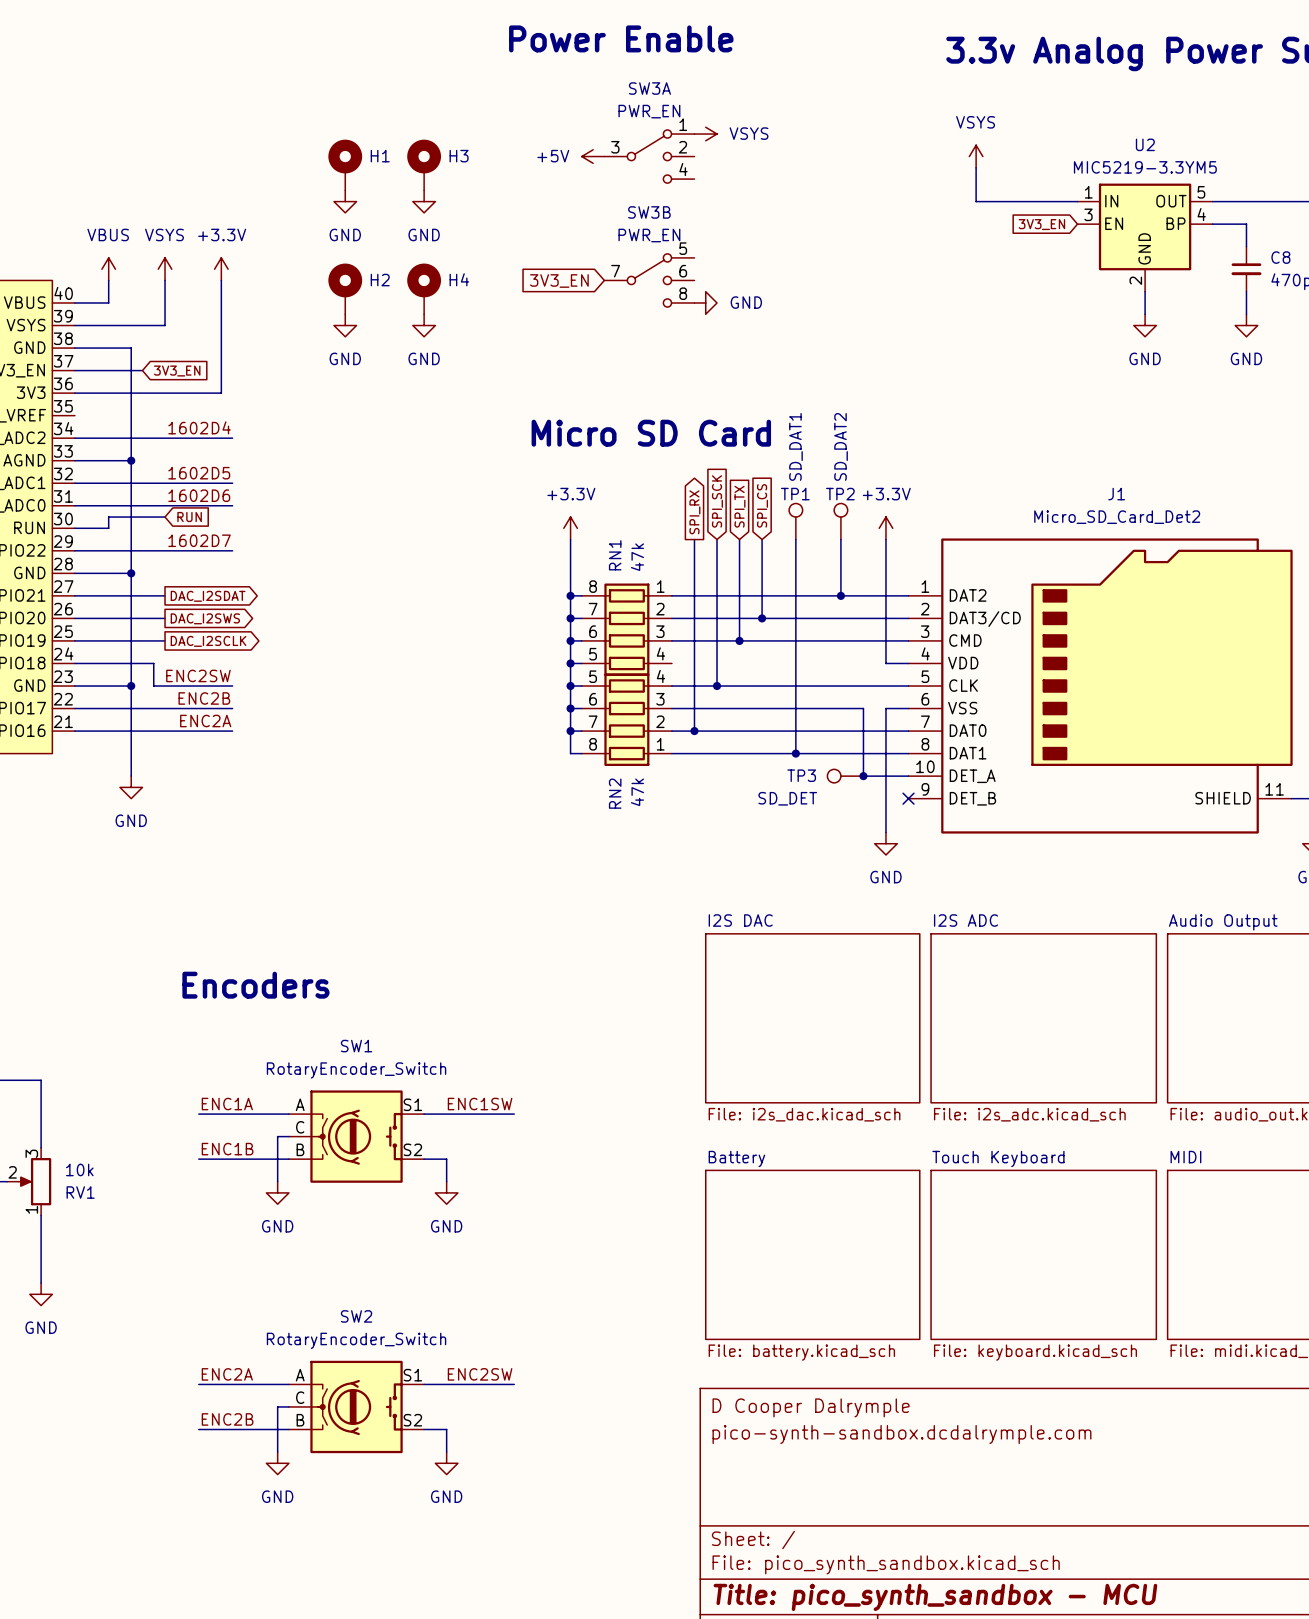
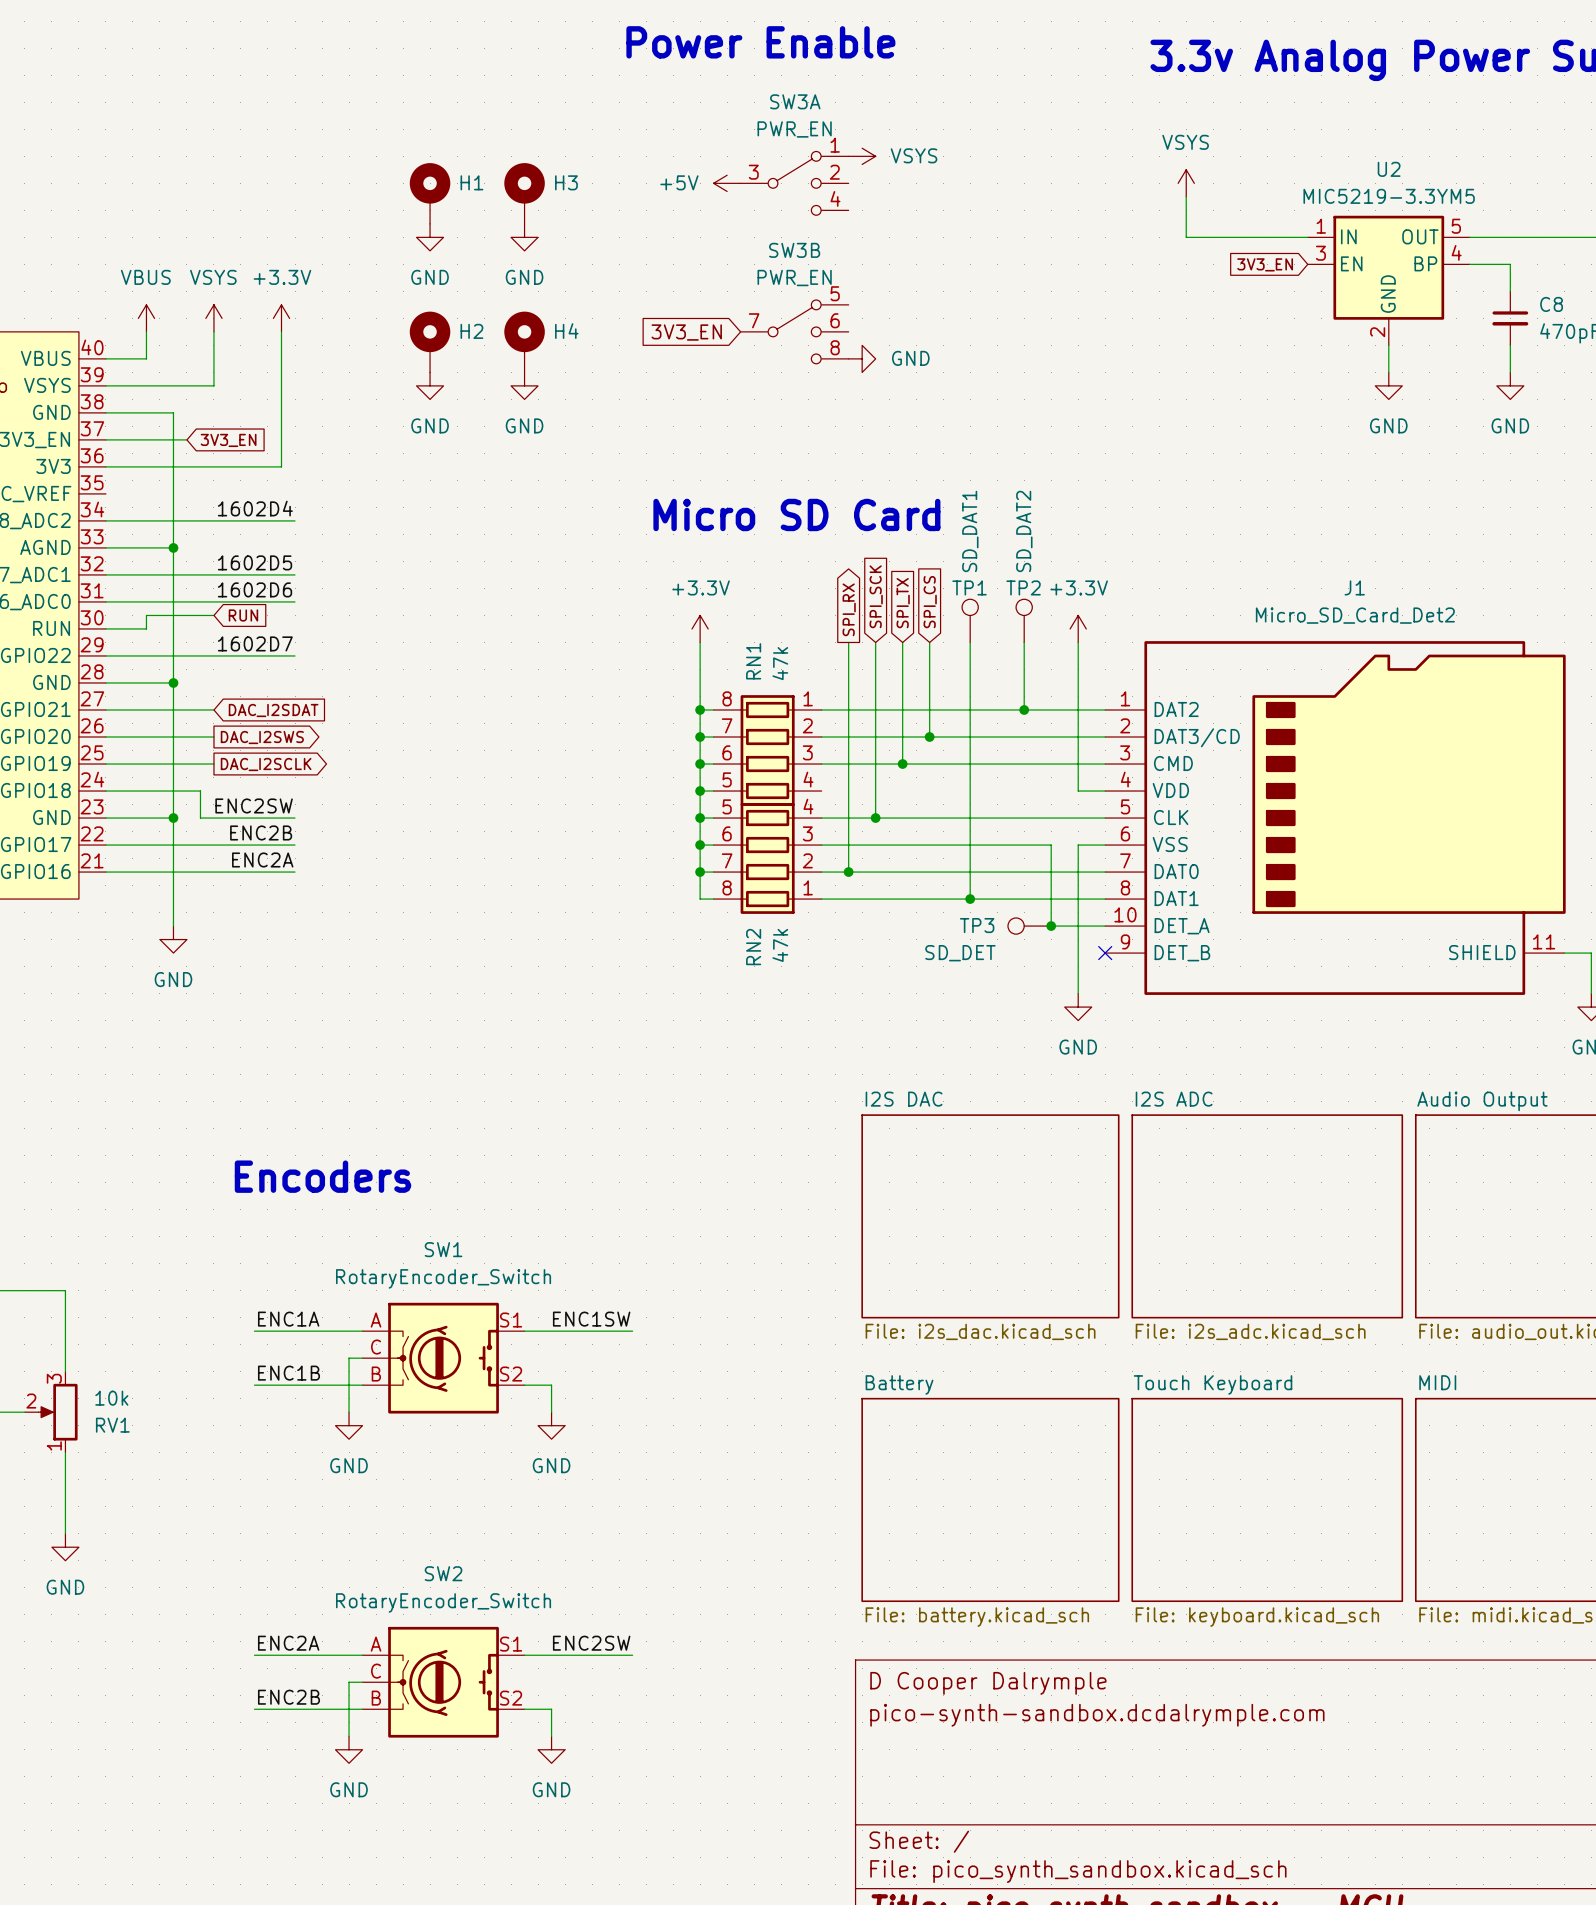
global label shape: output (208, 596) -> input (273, 710)

